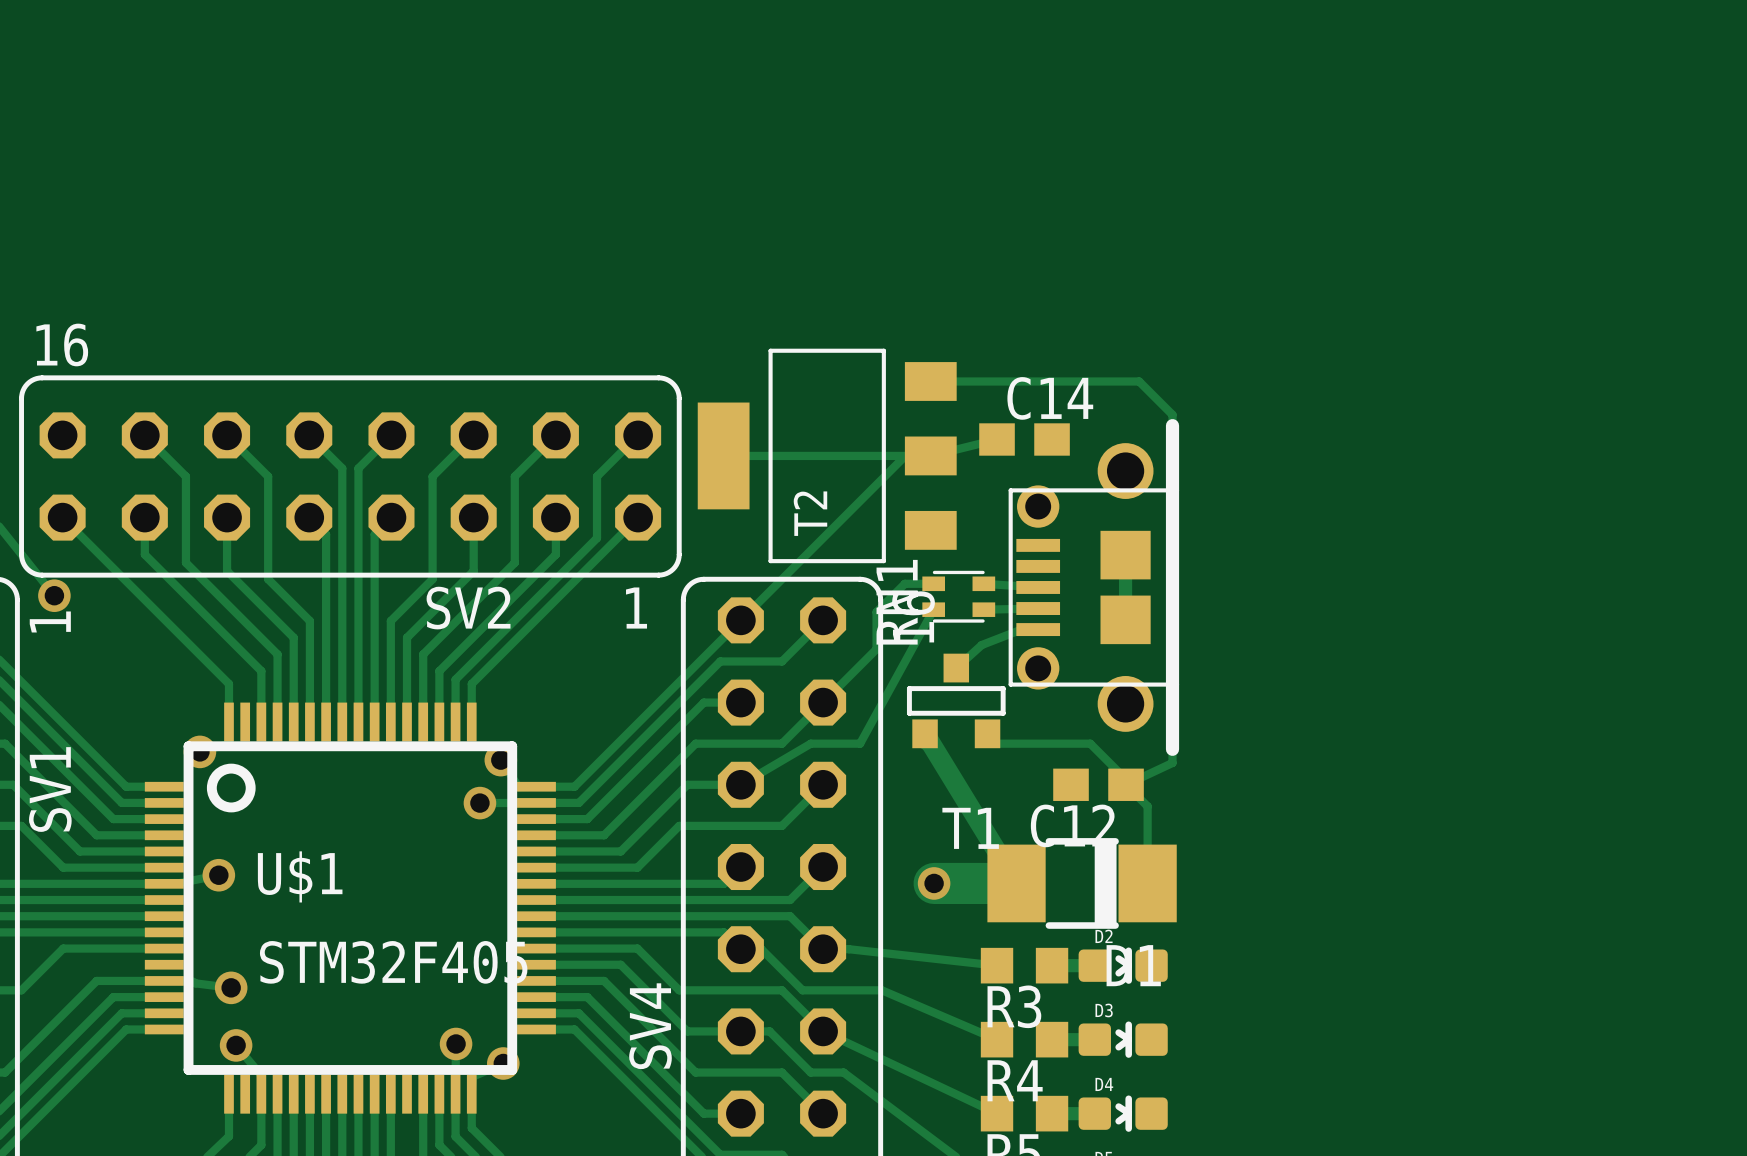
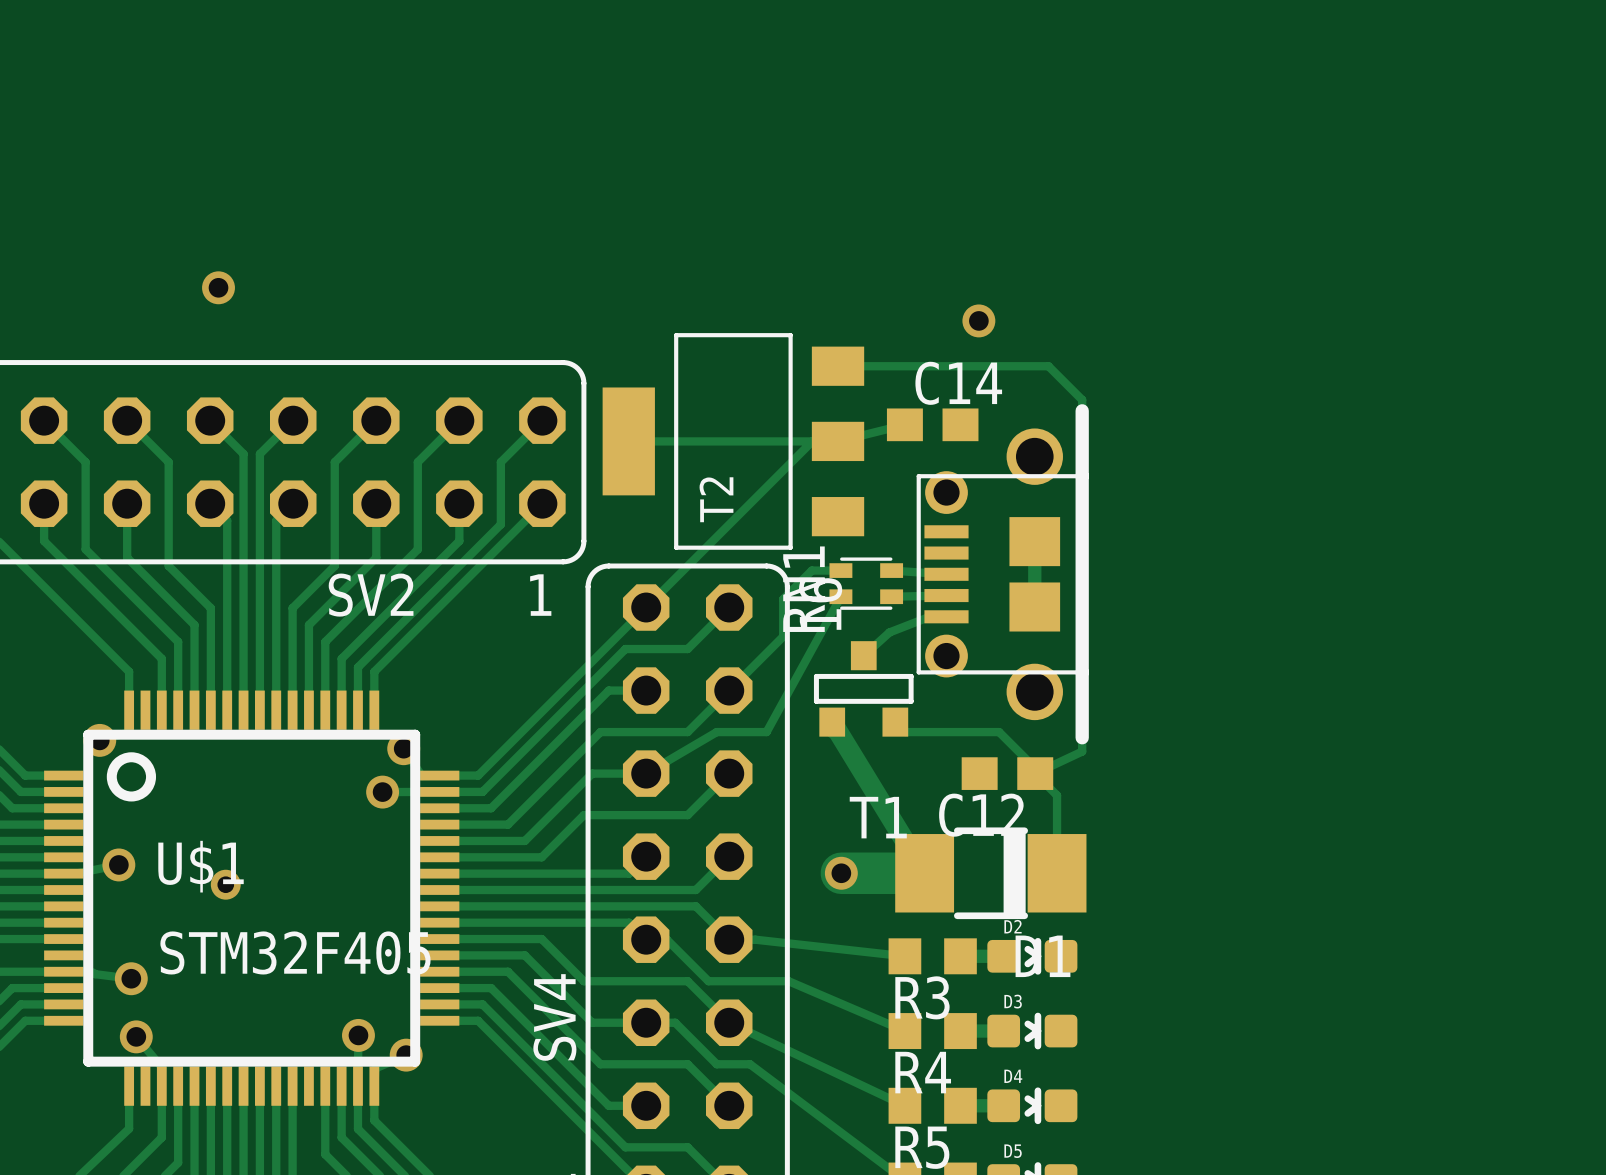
via: none -> (218, 287)
via: none -> (978, 320)
via: none -> (225, 884)

